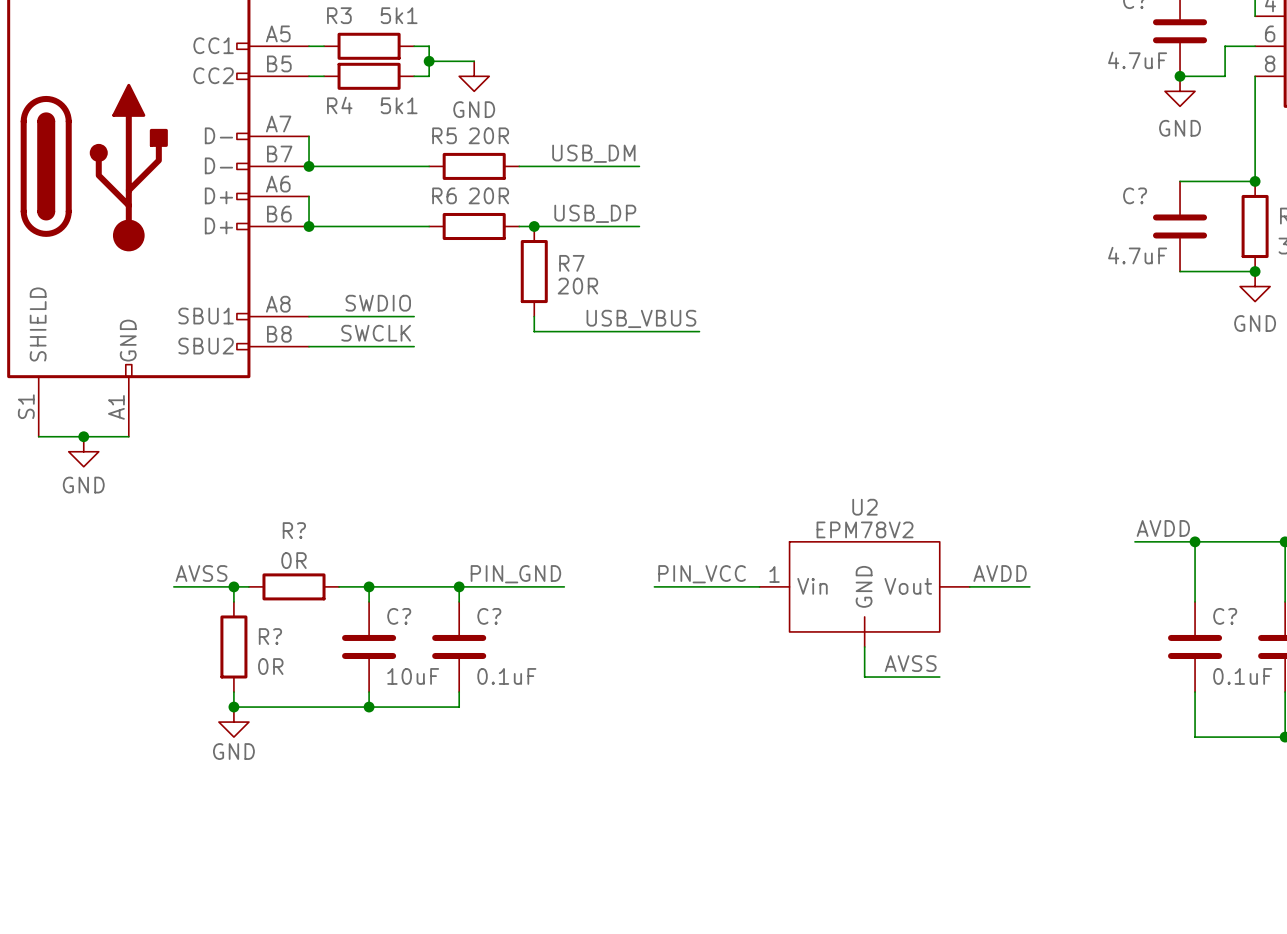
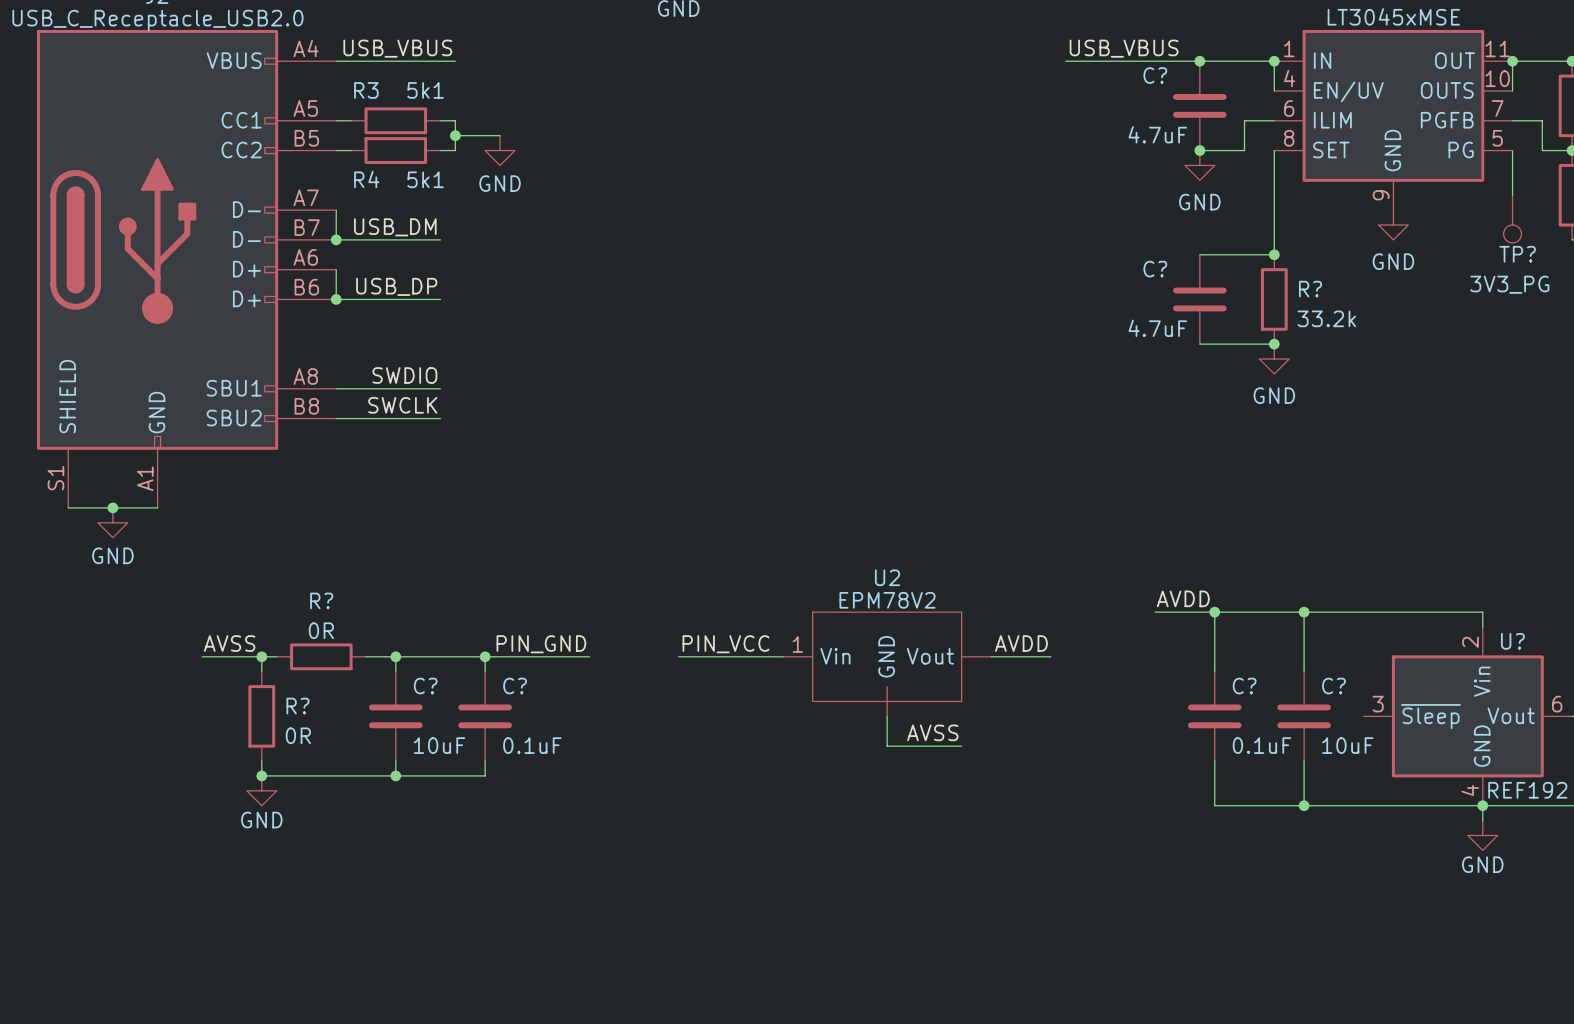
label position: USB_DM (593, 153) -> USB_DM (395, 227)
wire: (414, 166) (429, 166) -> none
R5: 20R (474, 166) -> none
wire: (519, 166) (639, 166) -> none
label position: USB_DP (595, 213) -> USB_DP (396, 286)
wire: (414, 226) (429, 226) -> none
R6: 20R (474, 226) -> none
wire: (519, 226) (639, 226) -> none
junction: (534, 226) -> none
R7: 20R (534, 271) -> none
wire: (534, 316) (534, 331) (699, 331) -> none
label: USB_VBUS (641, 318) -> none

